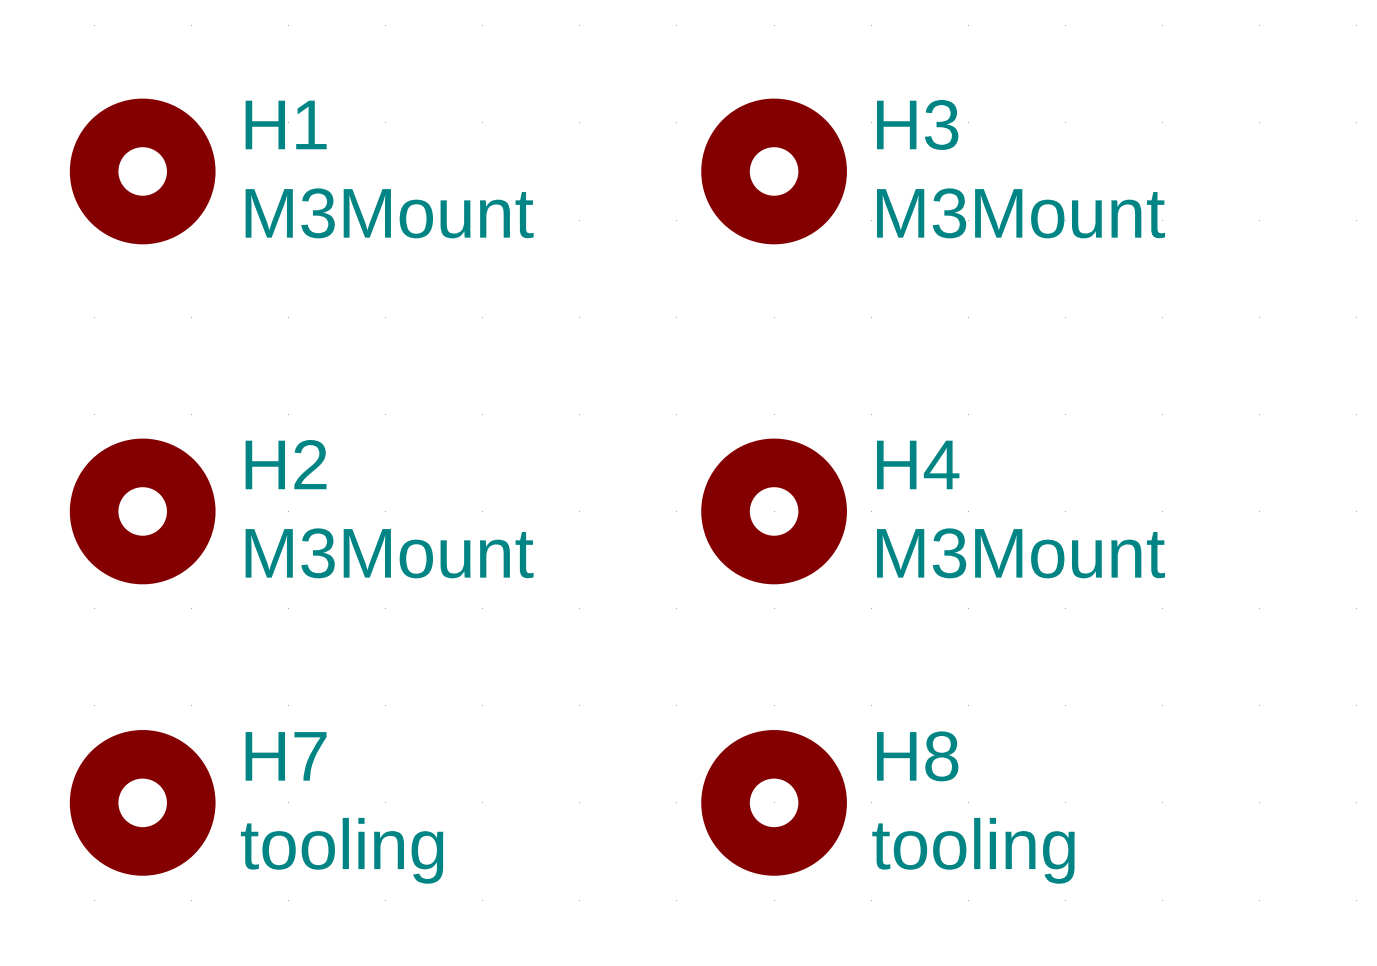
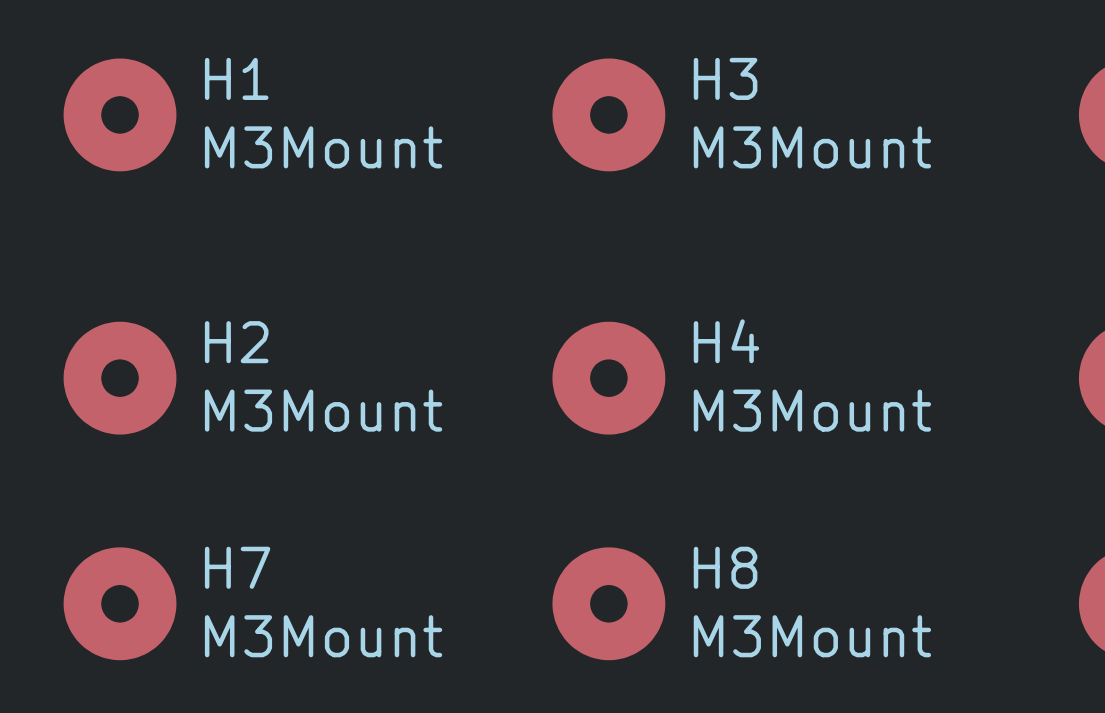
H7 value: tooling (342, 850) -> M3Mount (323, 636)
H8 value: tooling (973, 850) -> M3Mount (812, 636)

